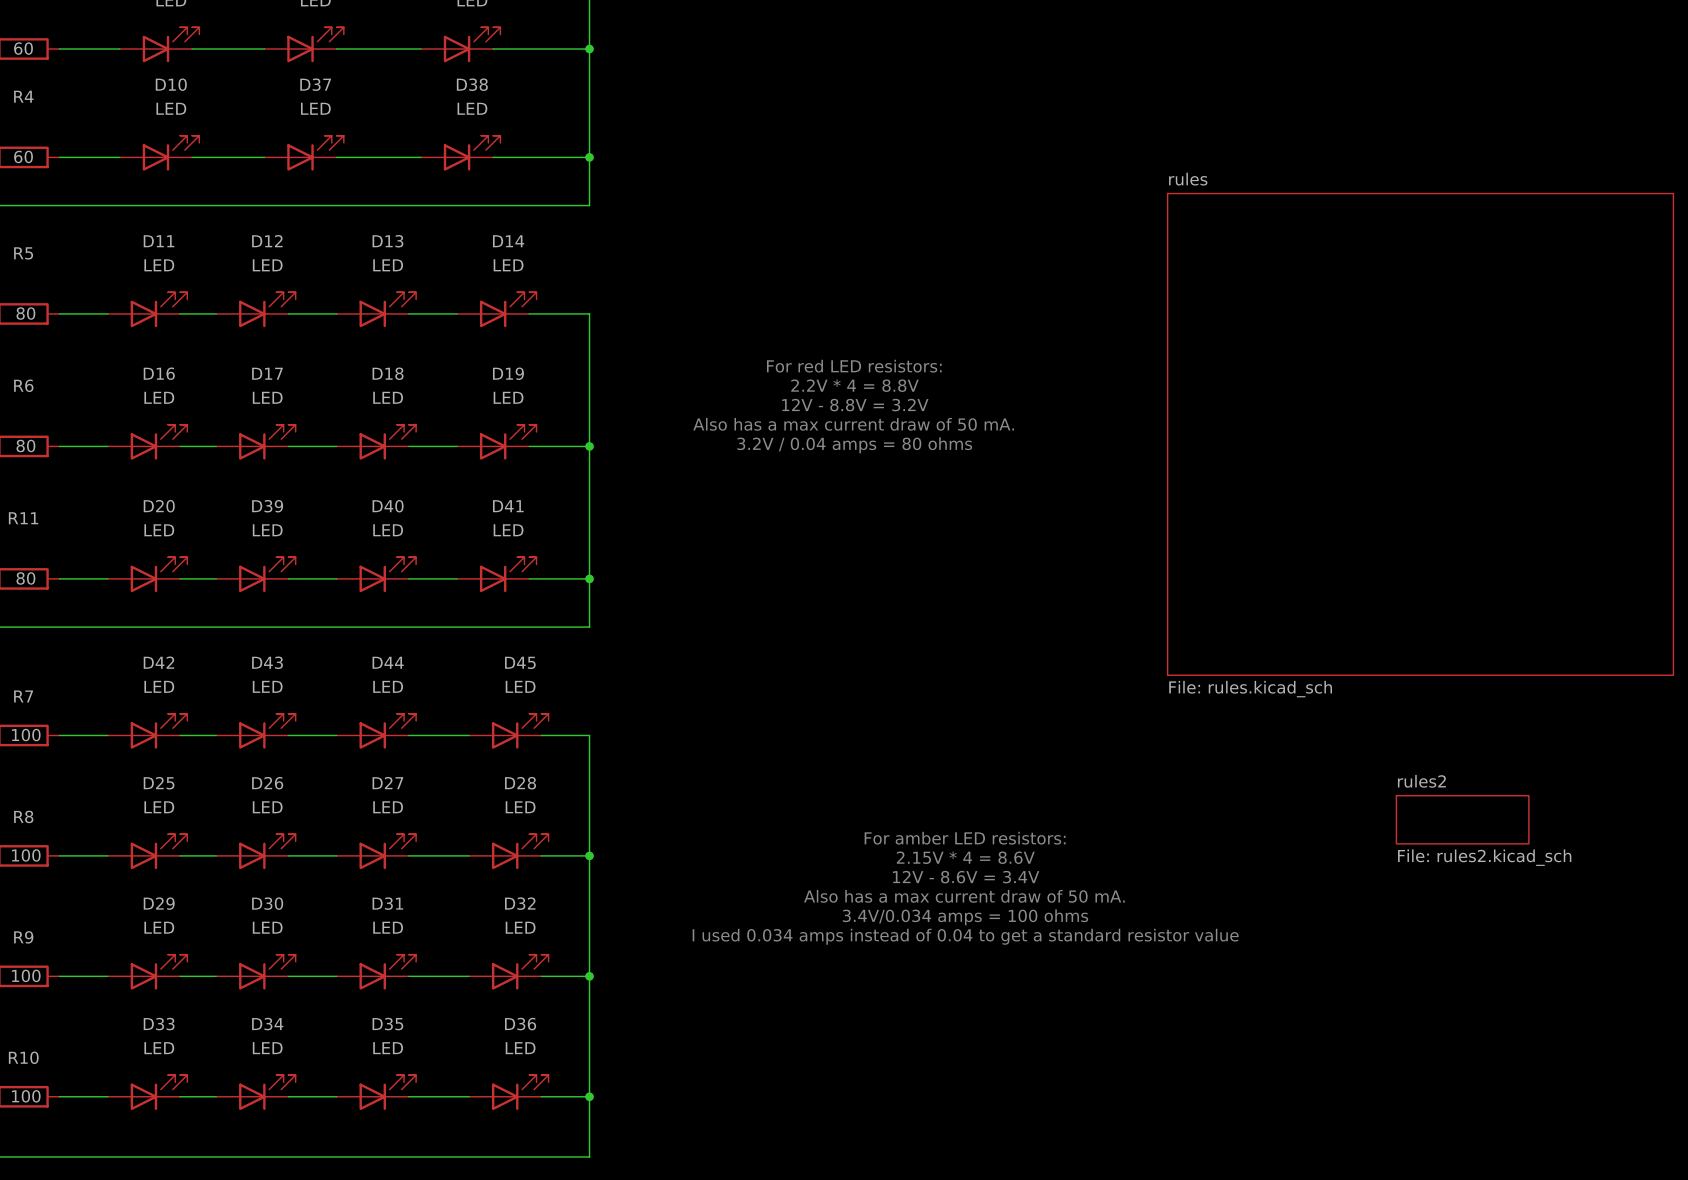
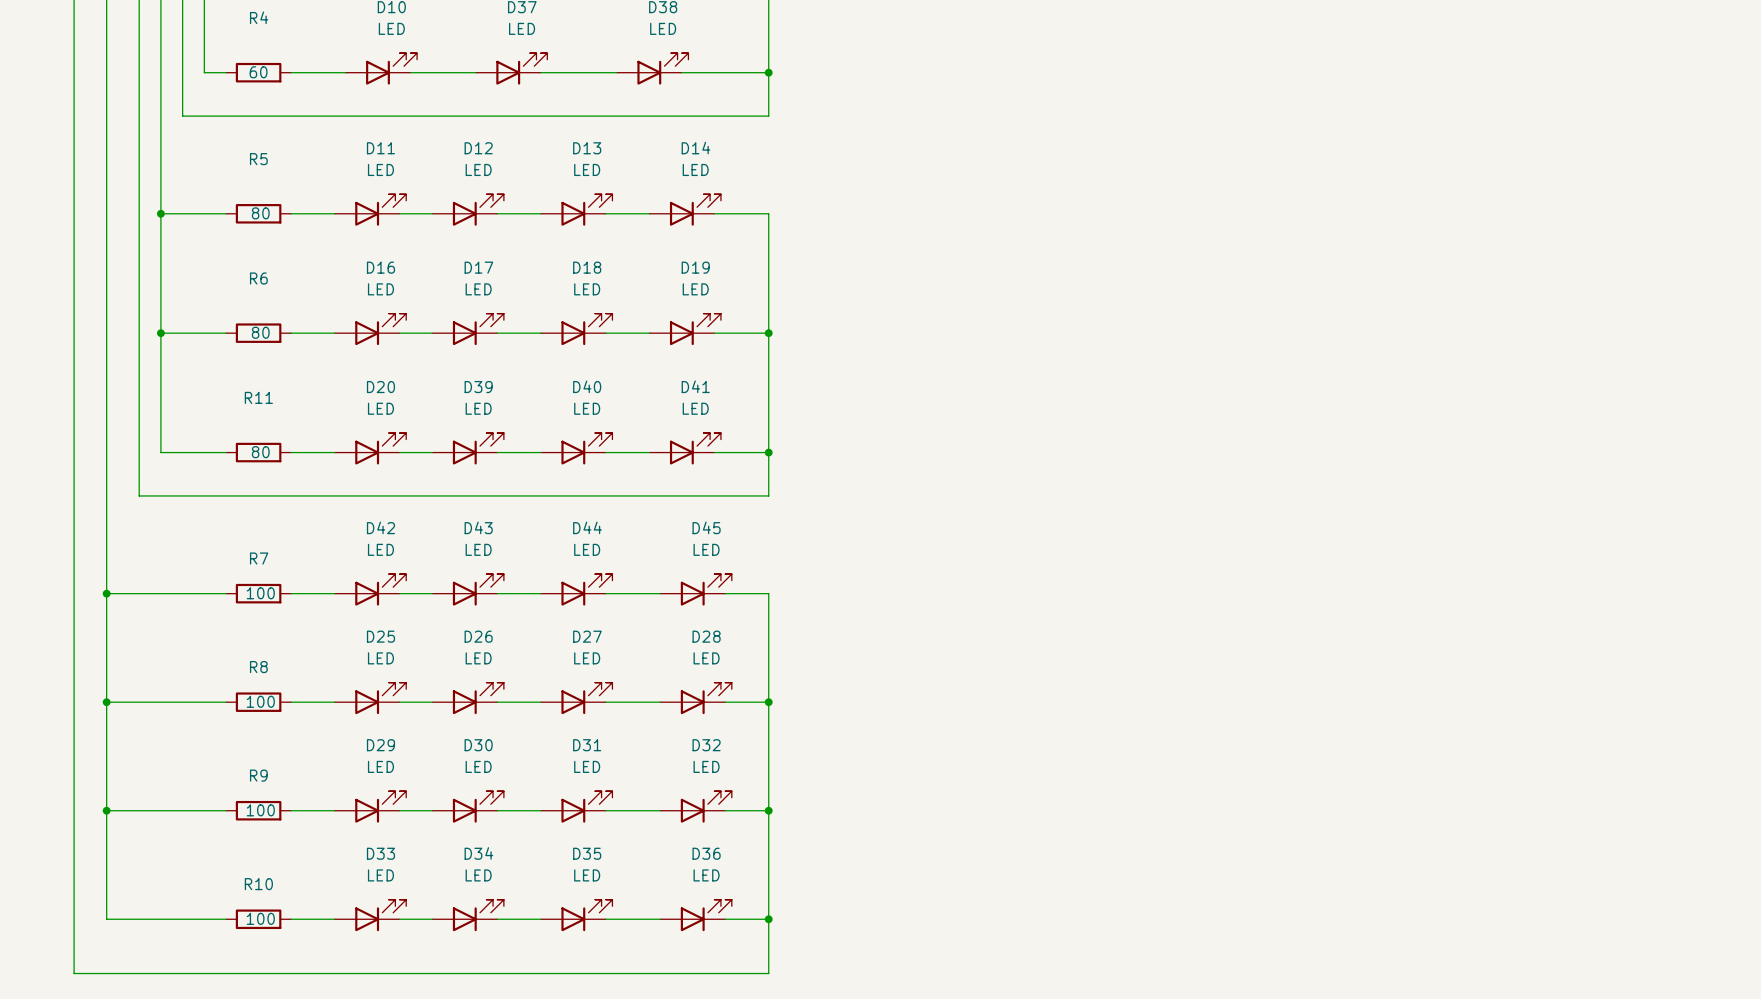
text: For red LED resistors: (854, 366) -> none
text: 2.2V * 4 = 8.8V (855, 385) -> none
text: 12V - 8.8V = 3.2V (855, 405) -> none
text: Also has a max current draw of 50 mA. (853, 424) -> none
sheet rules: File: rules.kicad_sch (1420, 434) -> none
text: 3.2V / 0.04 amps = 80 ohms (854, 445) -> none
sheet rules2: File: rules2.kicad_sch (1462, 819) -> none
text: For amber LED resistors: (965, 838) -> none
text: 2.15V * 4 = 8.6V (965, 857) -> none
text: 12V - 8.6V = 3.4V (966, 877) -> none
text: Also has a max current draw of 50 mA. (964, 896) -> none
text: 3.4V/0.034 amps = 100 ohms (965, 917) -> none
text: I used 0.034 amps instead of 0.04 to get a standard resistor value (965, 936) -> none

